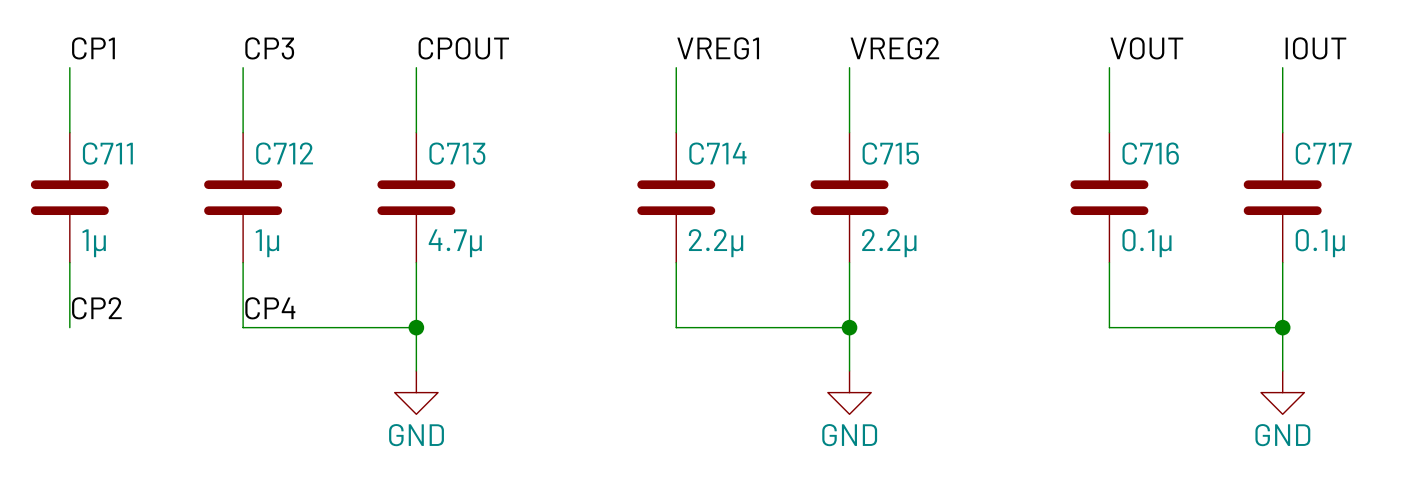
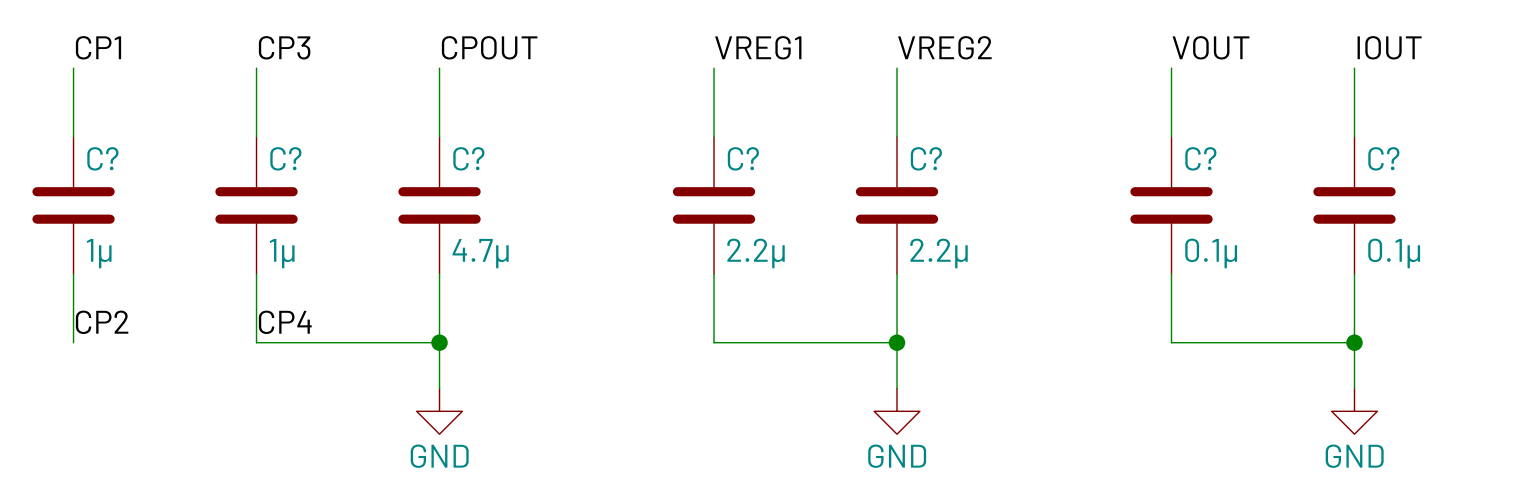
C711 name: C711 (107, 153) -> C? (102, 158)
C712 name: C712 (284, 153) -> C? (285, 158)
C713 name: C713 (457, 153) -> C? (468, 158)
C714 name: C714 (717, 153) -> C? (743, 158)
C715 name: C715 (890, 153) -> C? (926, 158)
C716 name: C716 (1150, 153) -> C? (1200, 158)
C717 name: C717 (1323, 153) -> C? (1383, 158)

